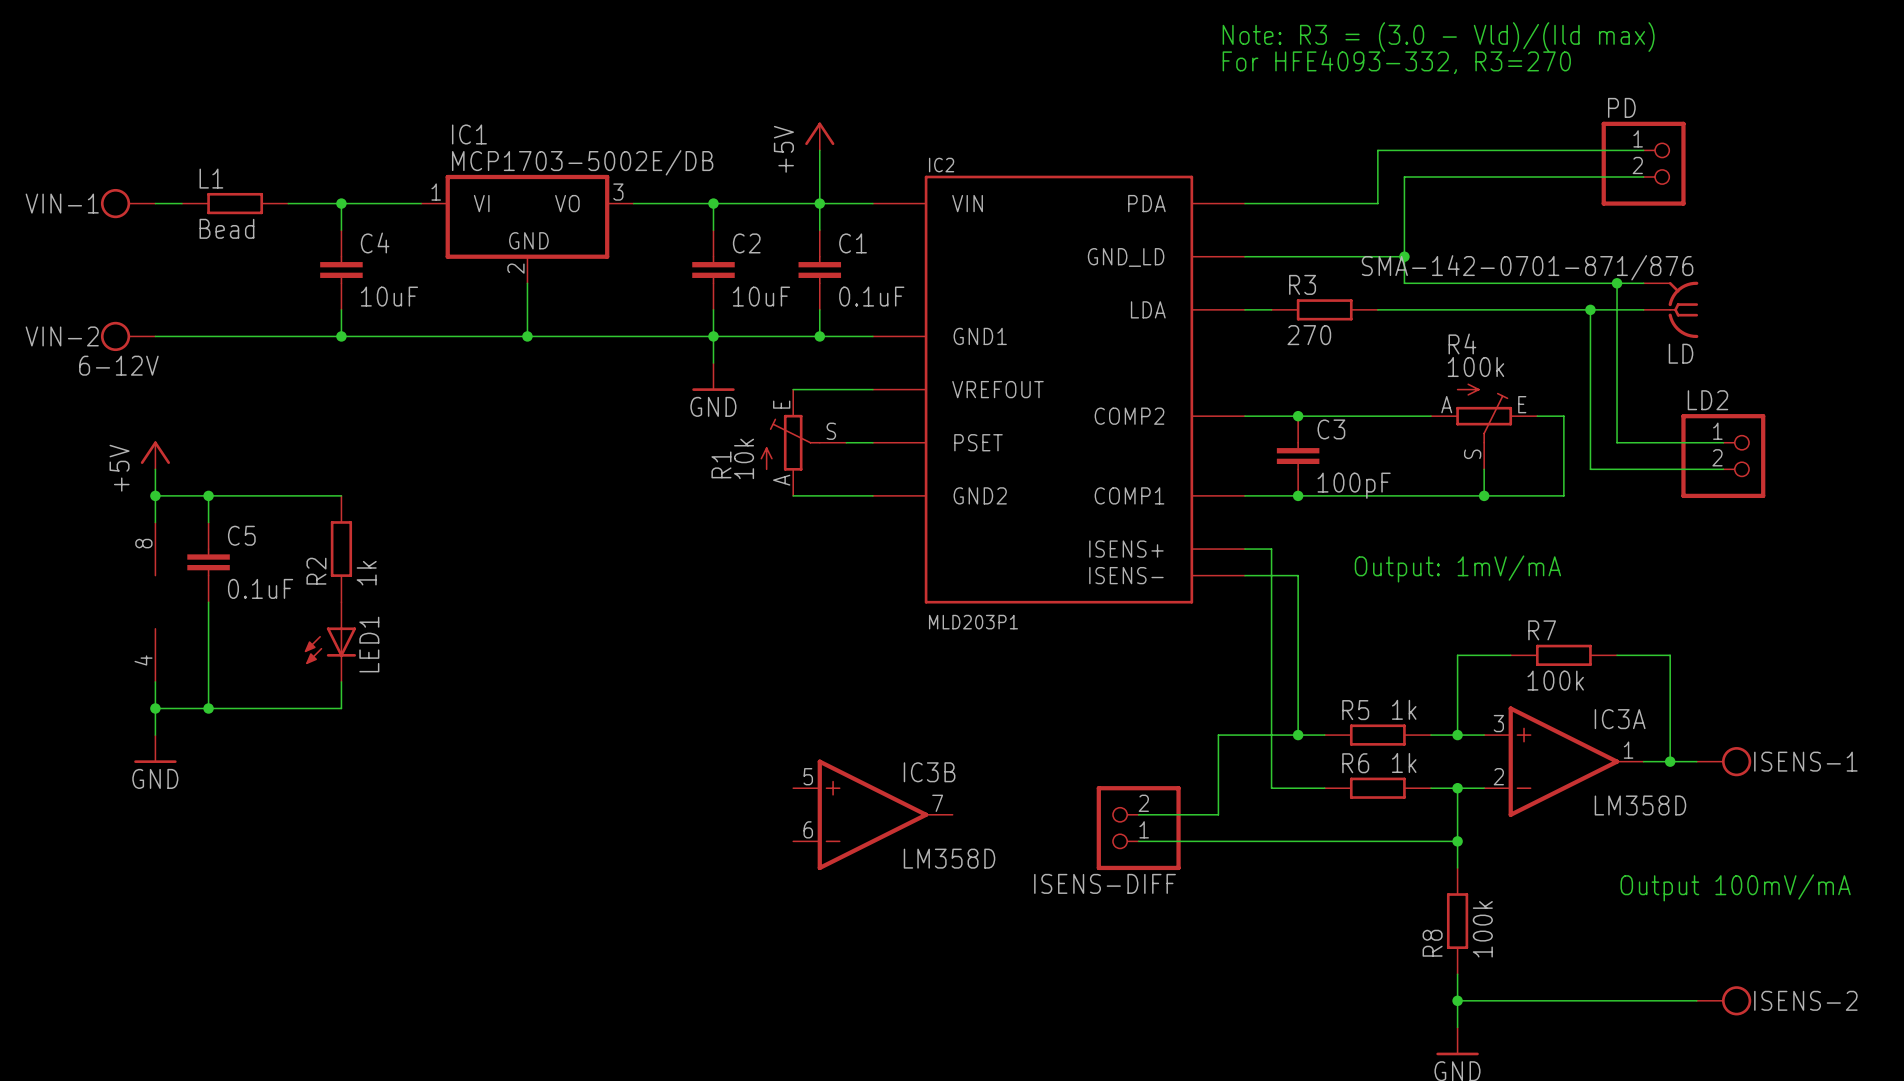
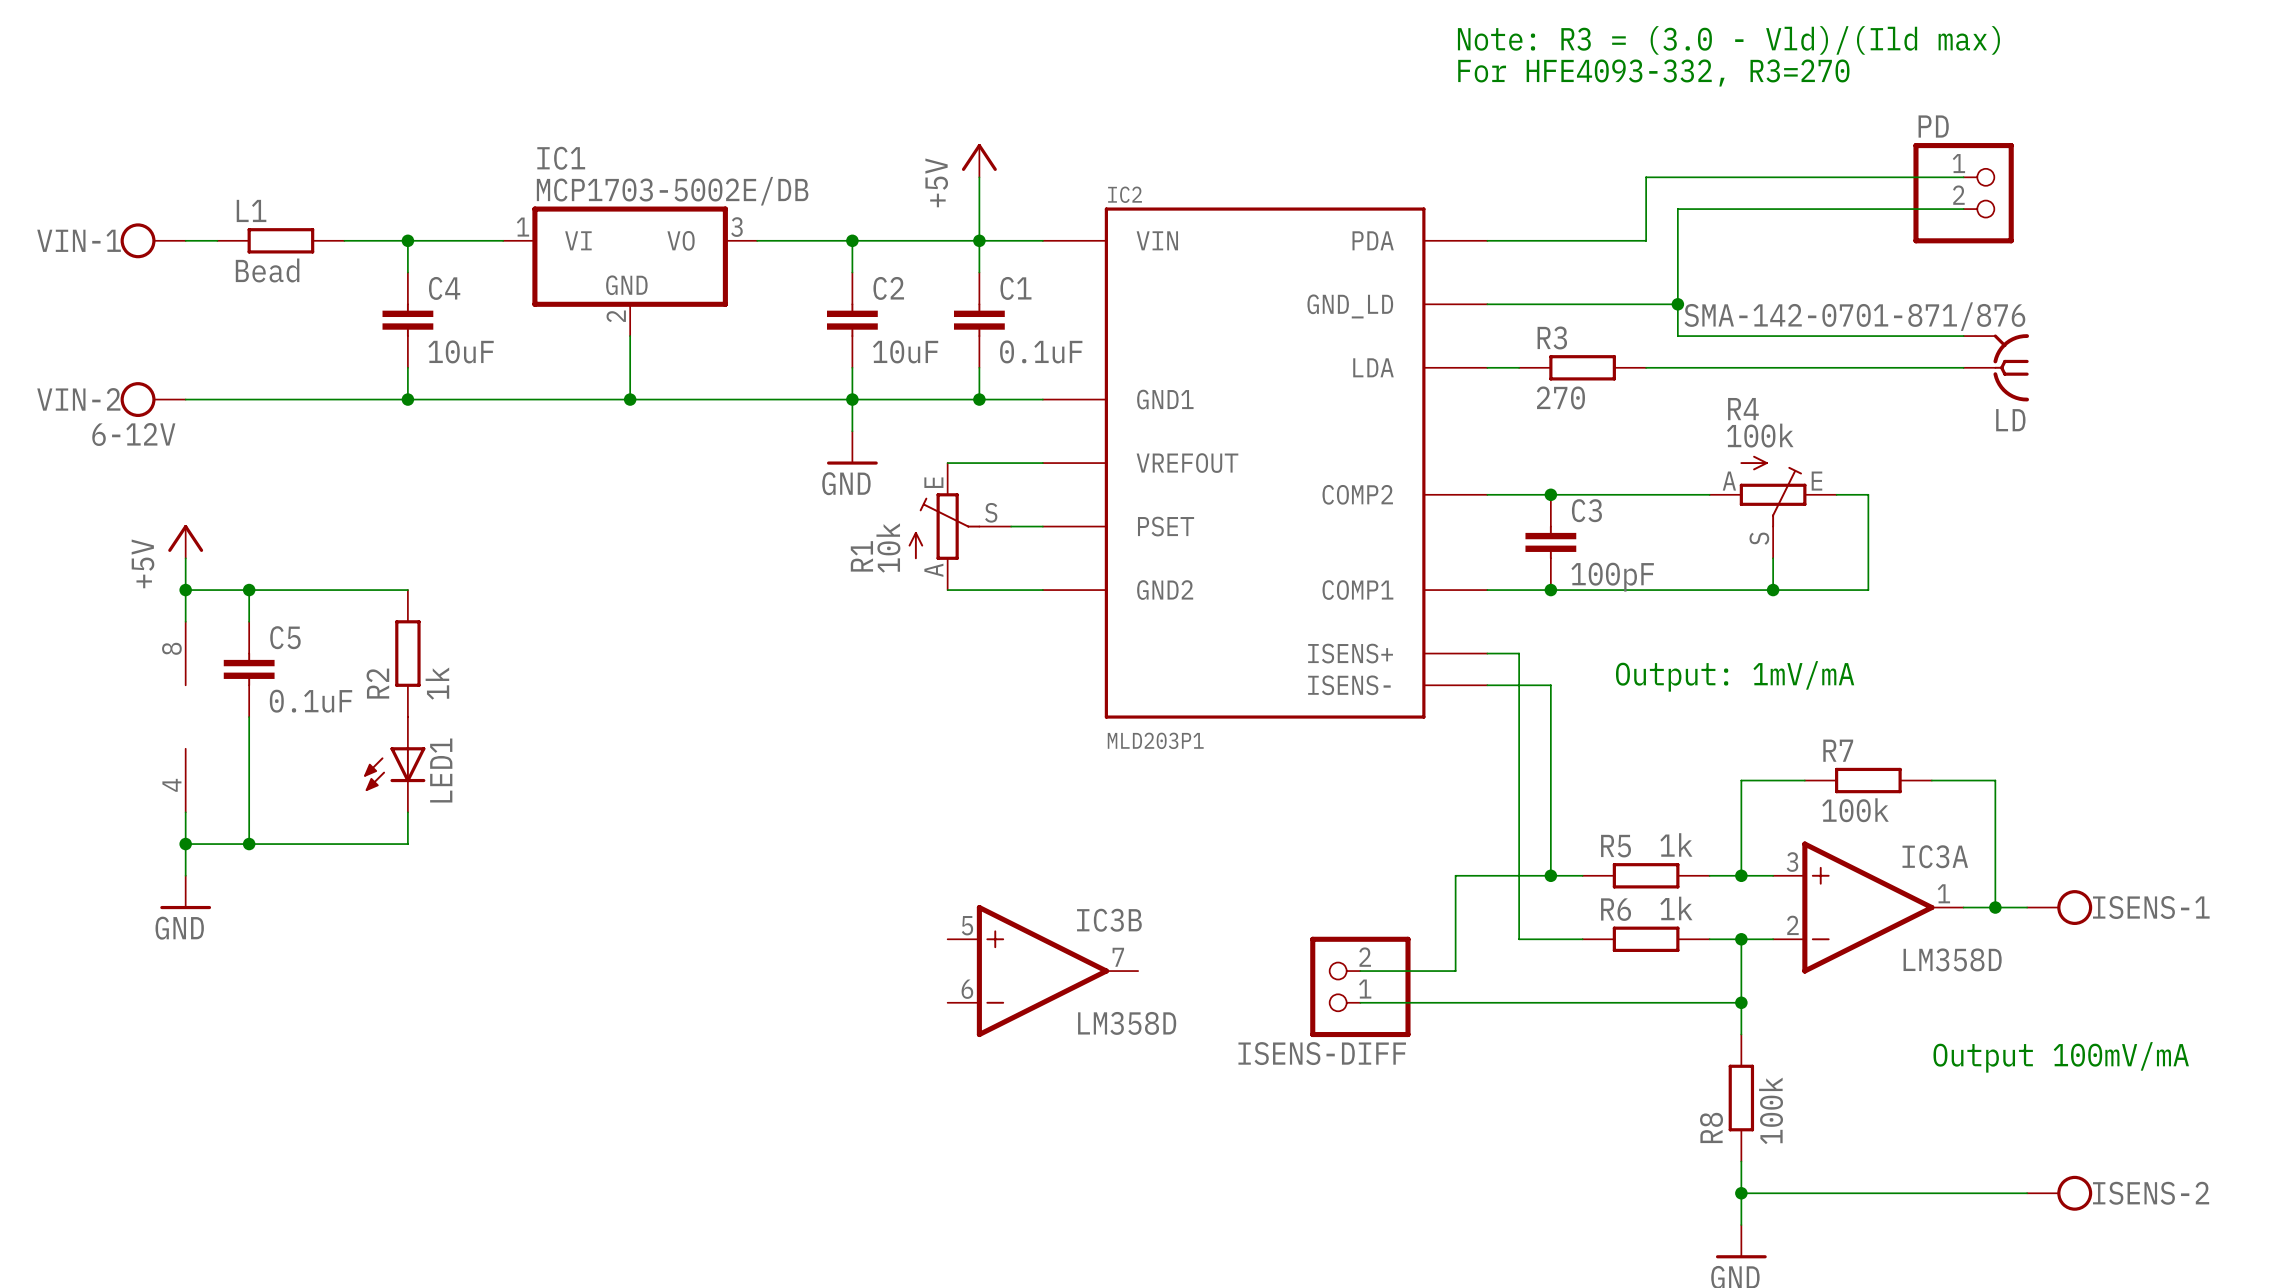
wire: (1617, 283) (1617, 442) (1723, 442) -> none
junction: (1617, 283) -> none
wire: (1590, 309) (1590, 469) (1723, 469) -> none
junction: (1590, 309) -> none
LD2: (1723, 456) -> none

